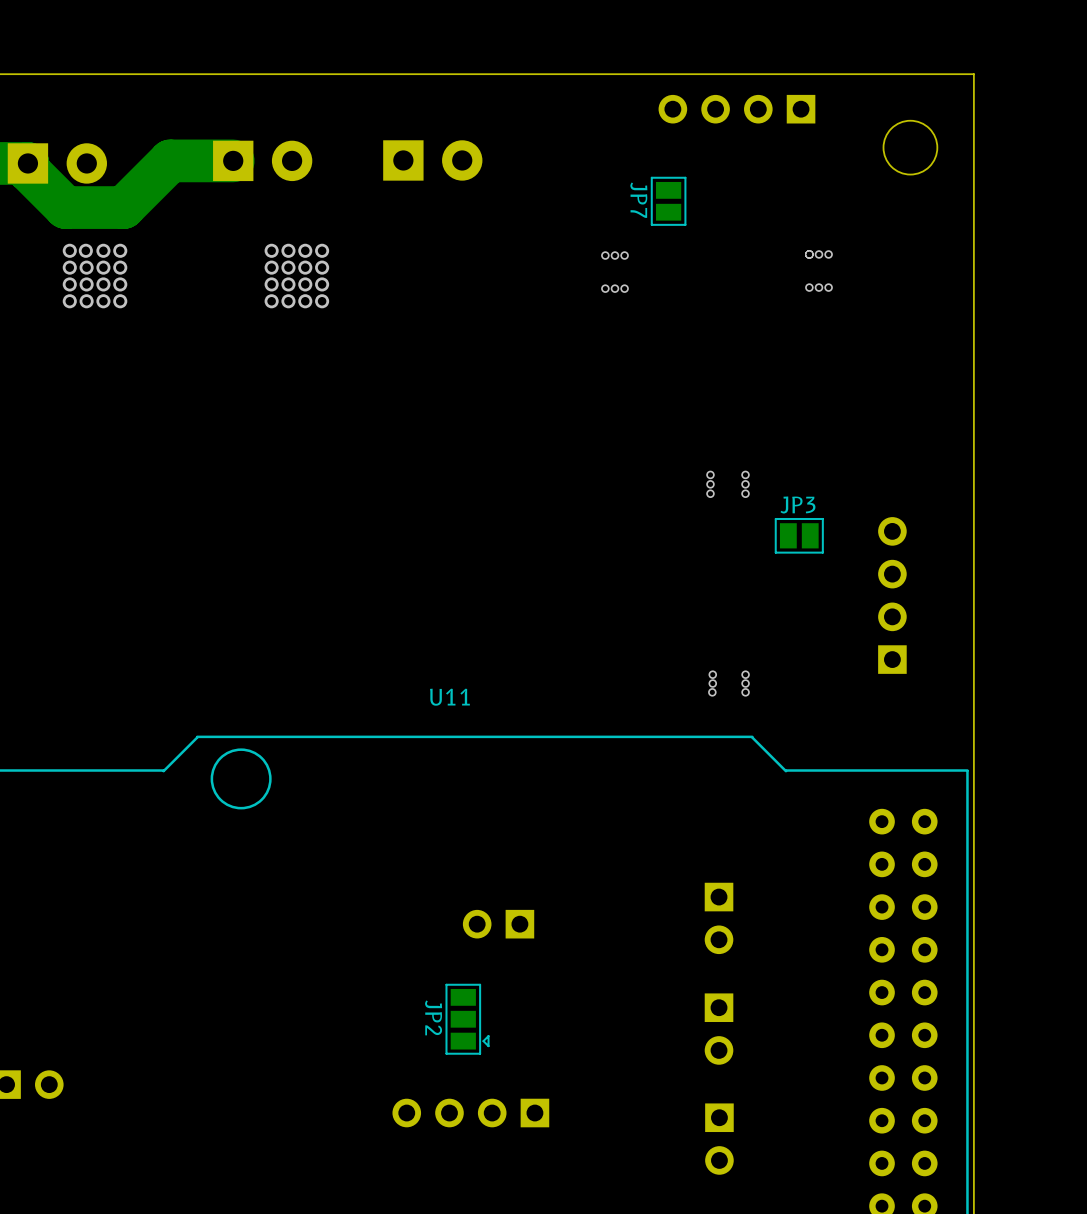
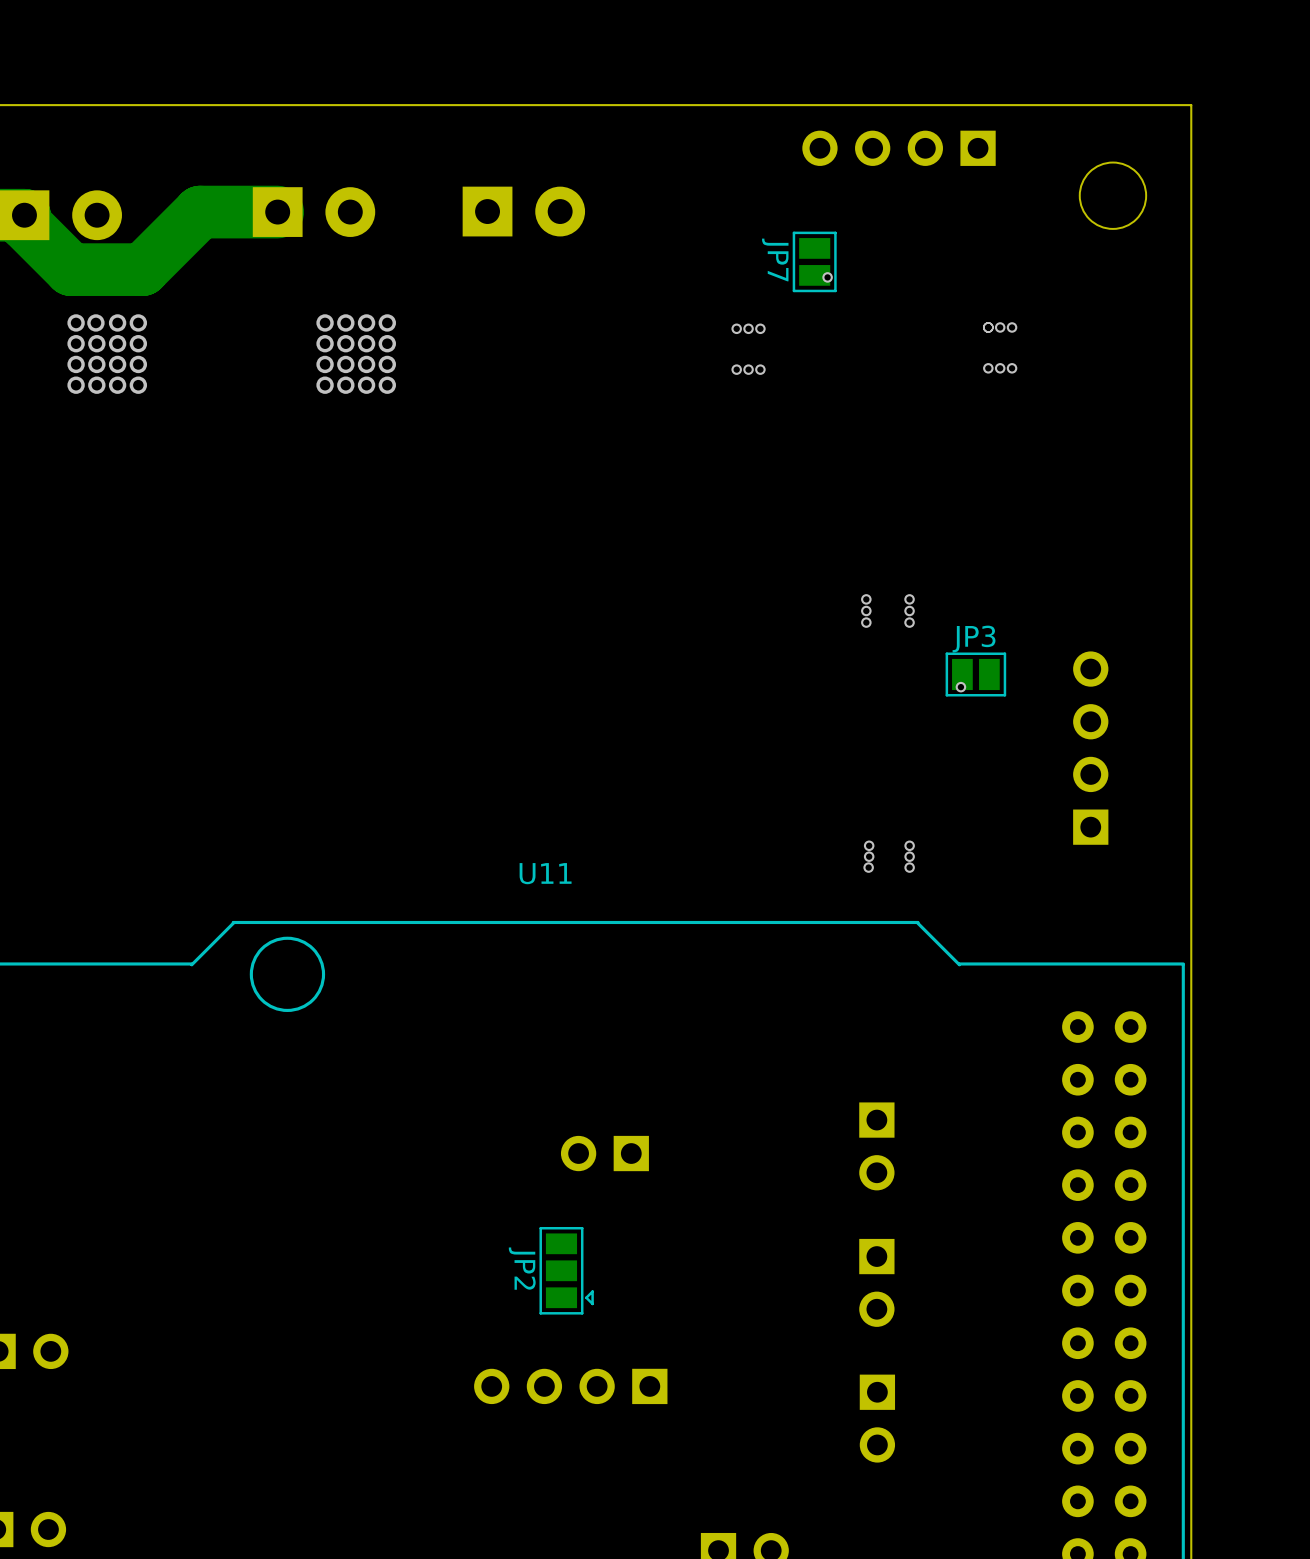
via: none -> (827, 277)
via: none -> (960, 687)

